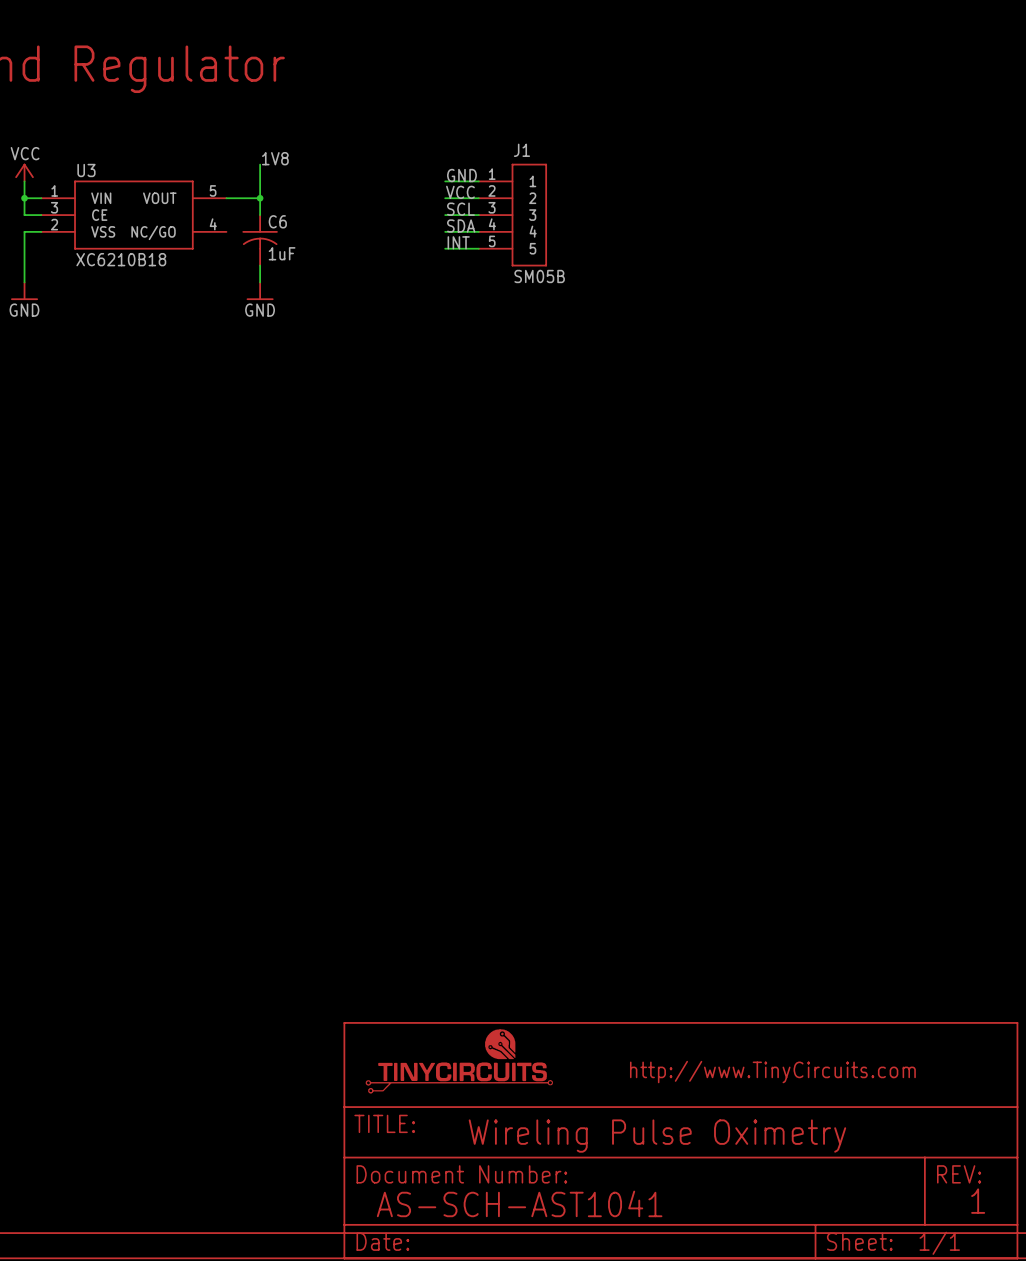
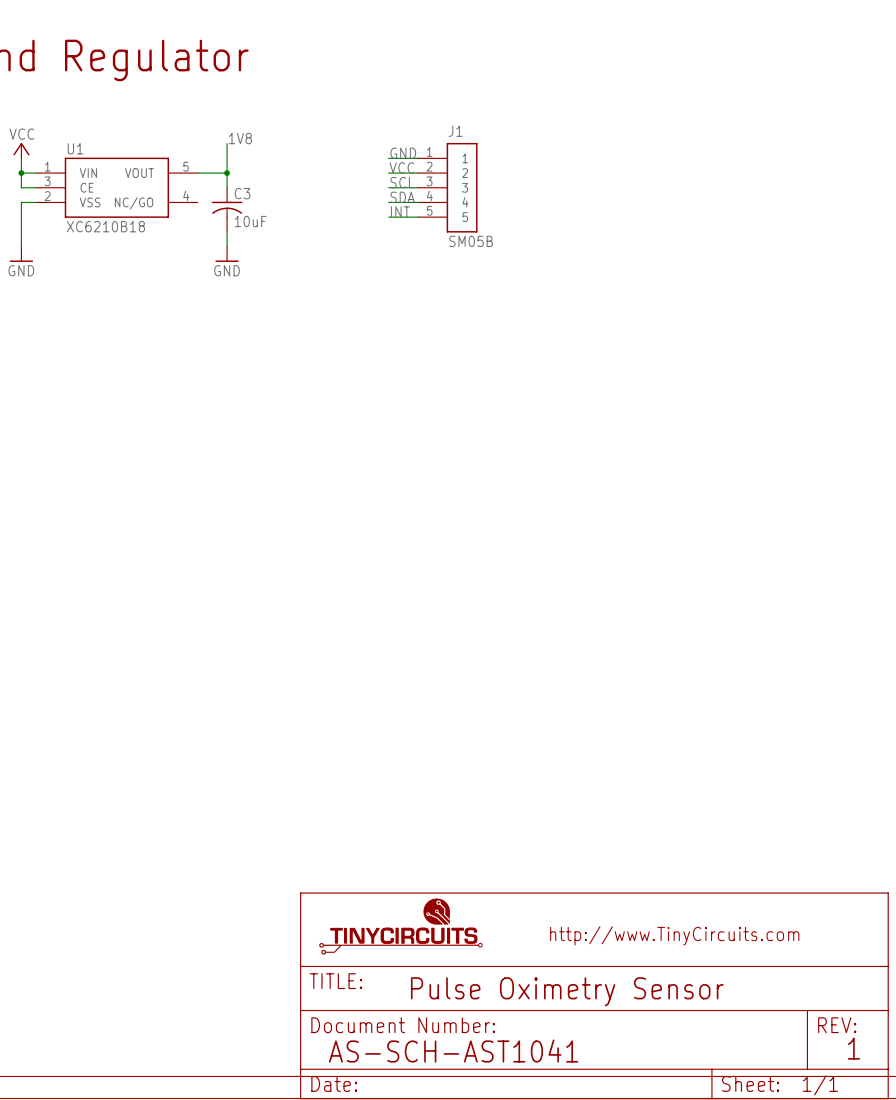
U3 name: U3 (86, 170) -> U1 (75, 148)
C6 name: C6 (277, 221) -> C3 (242, 193)
C6 value: 1uF (282, 253) -> 10uF (250, 221)
text: Wireling Pulse Oximetry (657, 1136) -> Pulse Oximetry Sensor (567, 991)

